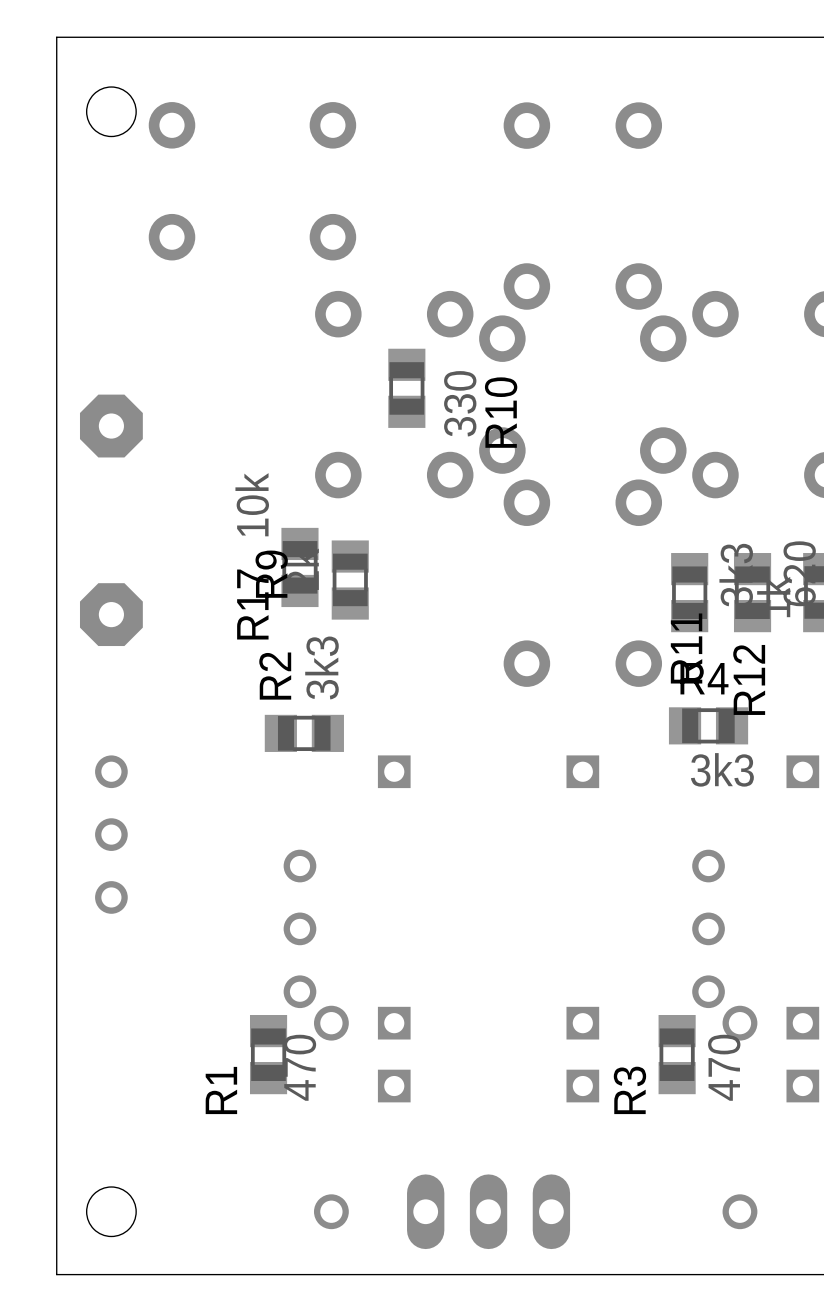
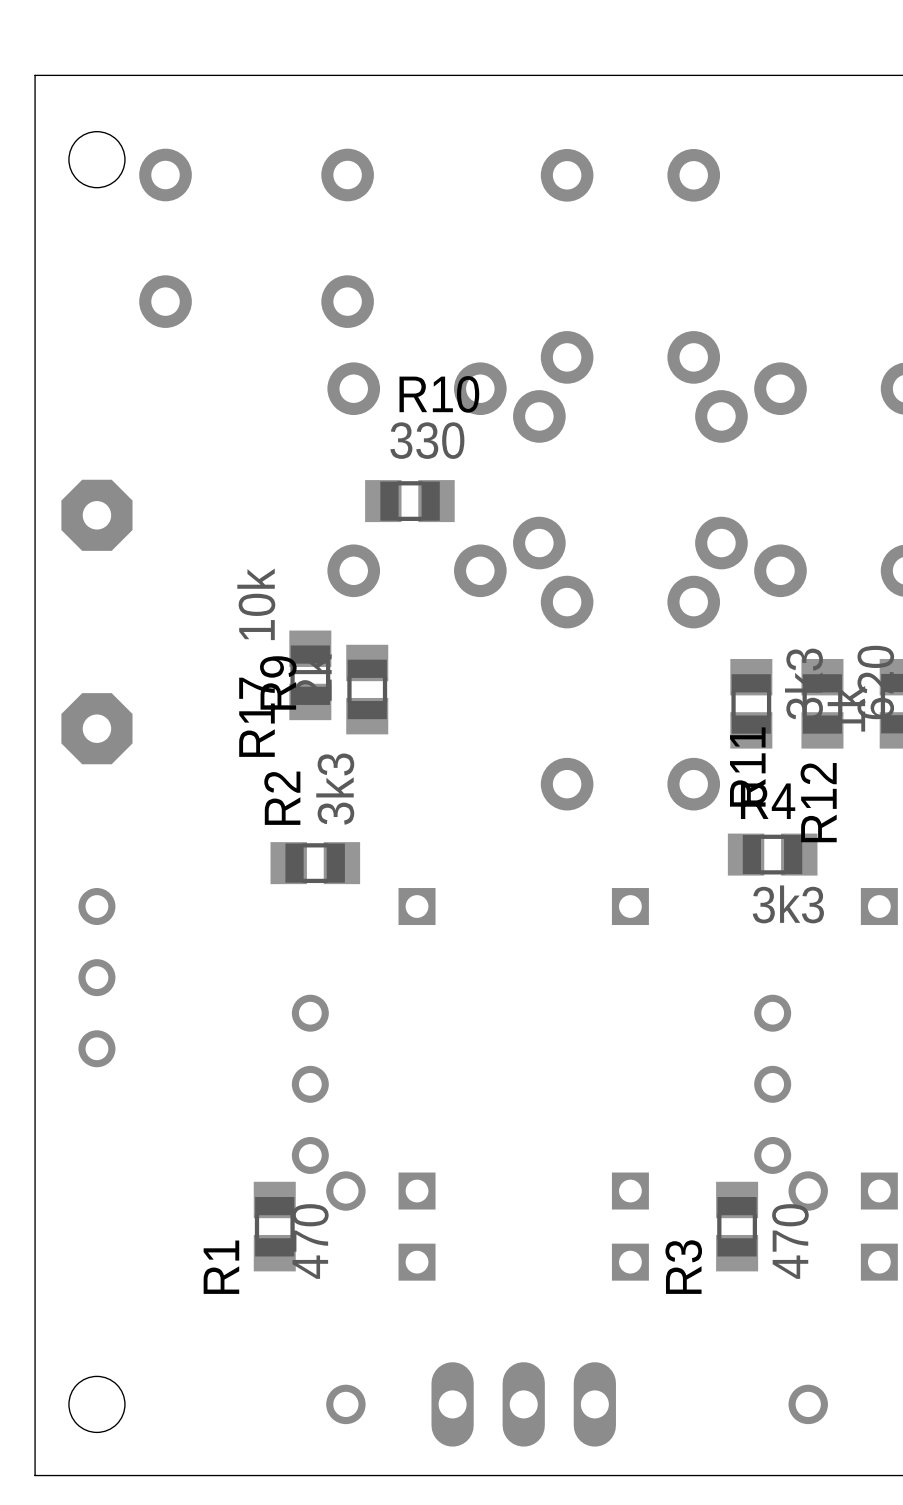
R10 rotation: 0° (406, 388) -> 90° clockwise (409, 501)
R10 value position: 330 (460, 403) -> 330 (427, 440)
R10 name position: R10 (501, 412) -> R10 (439, 394)

